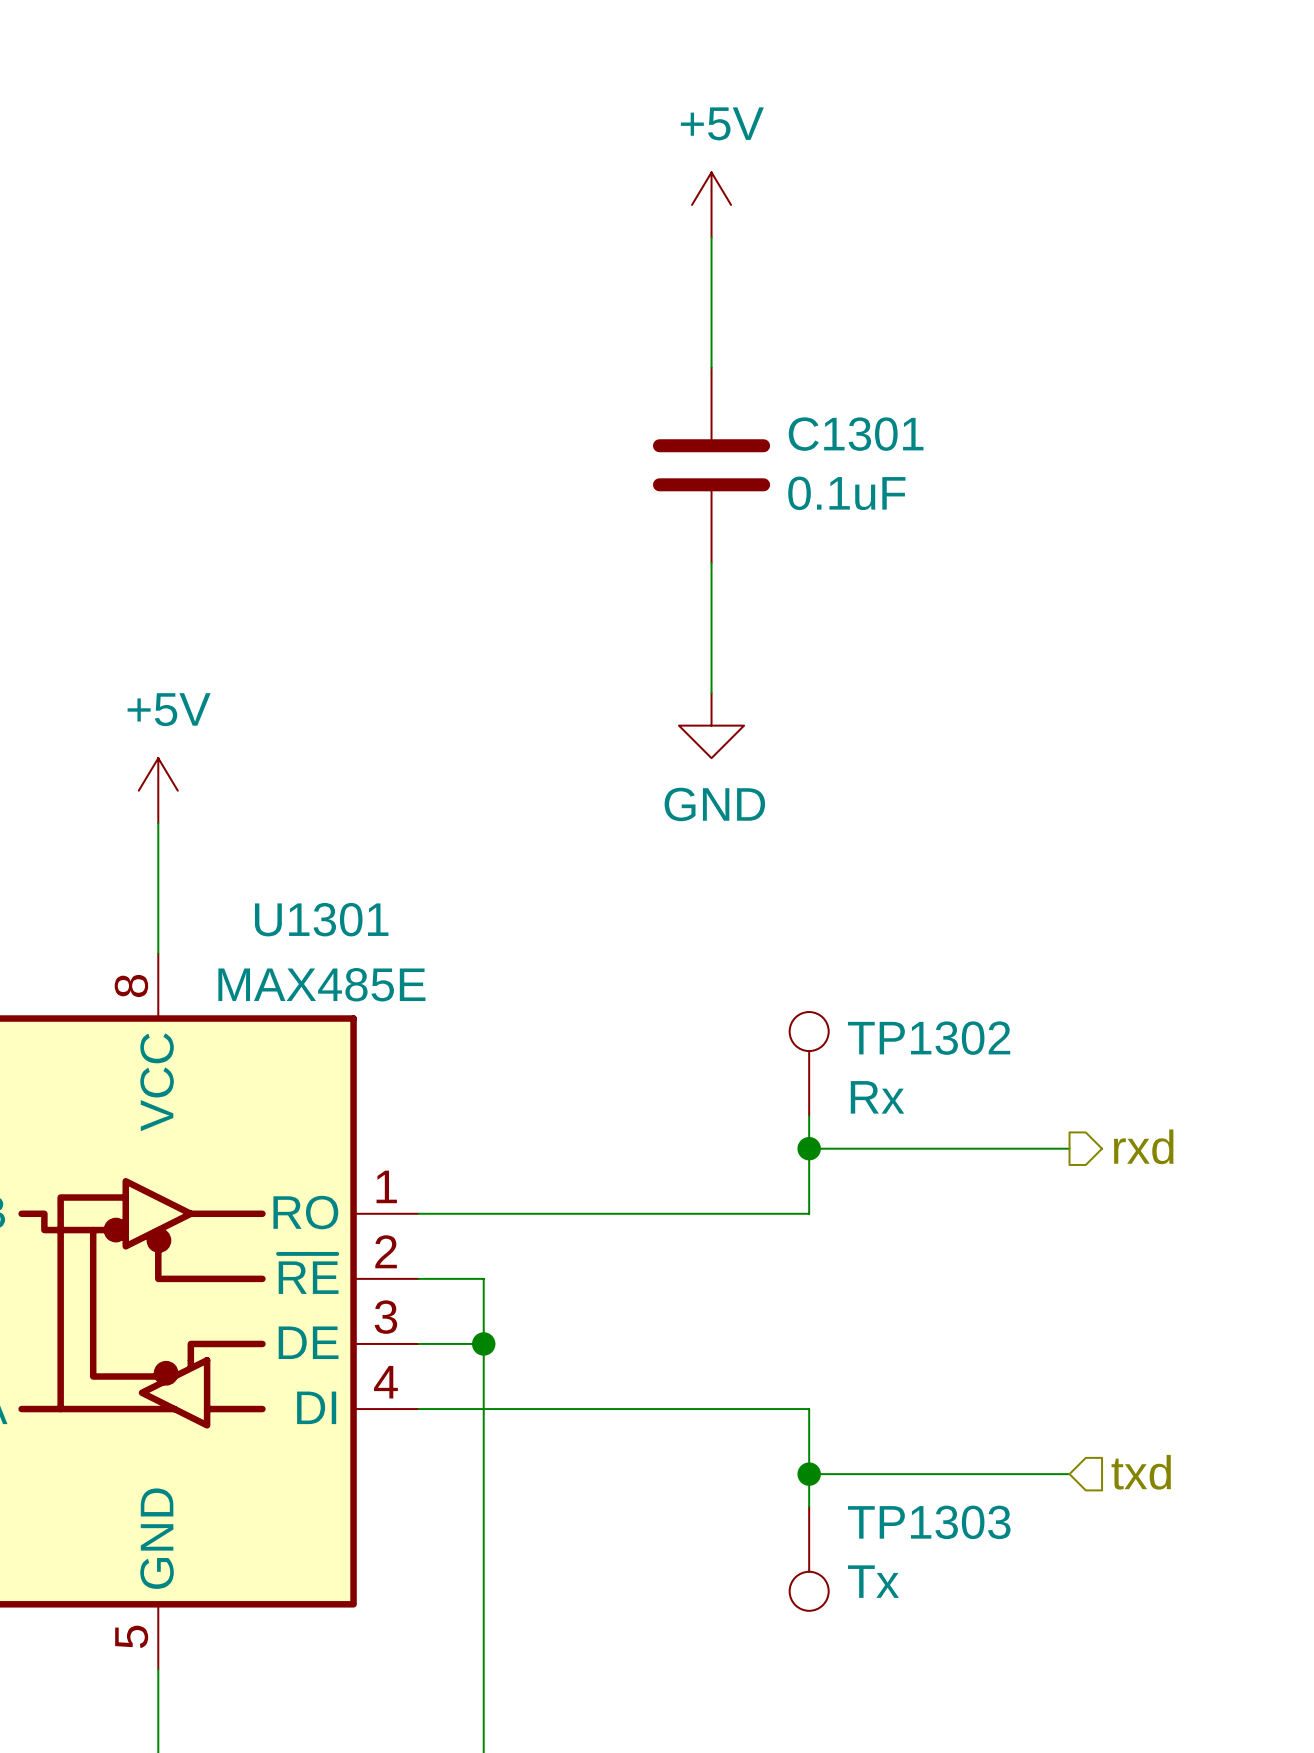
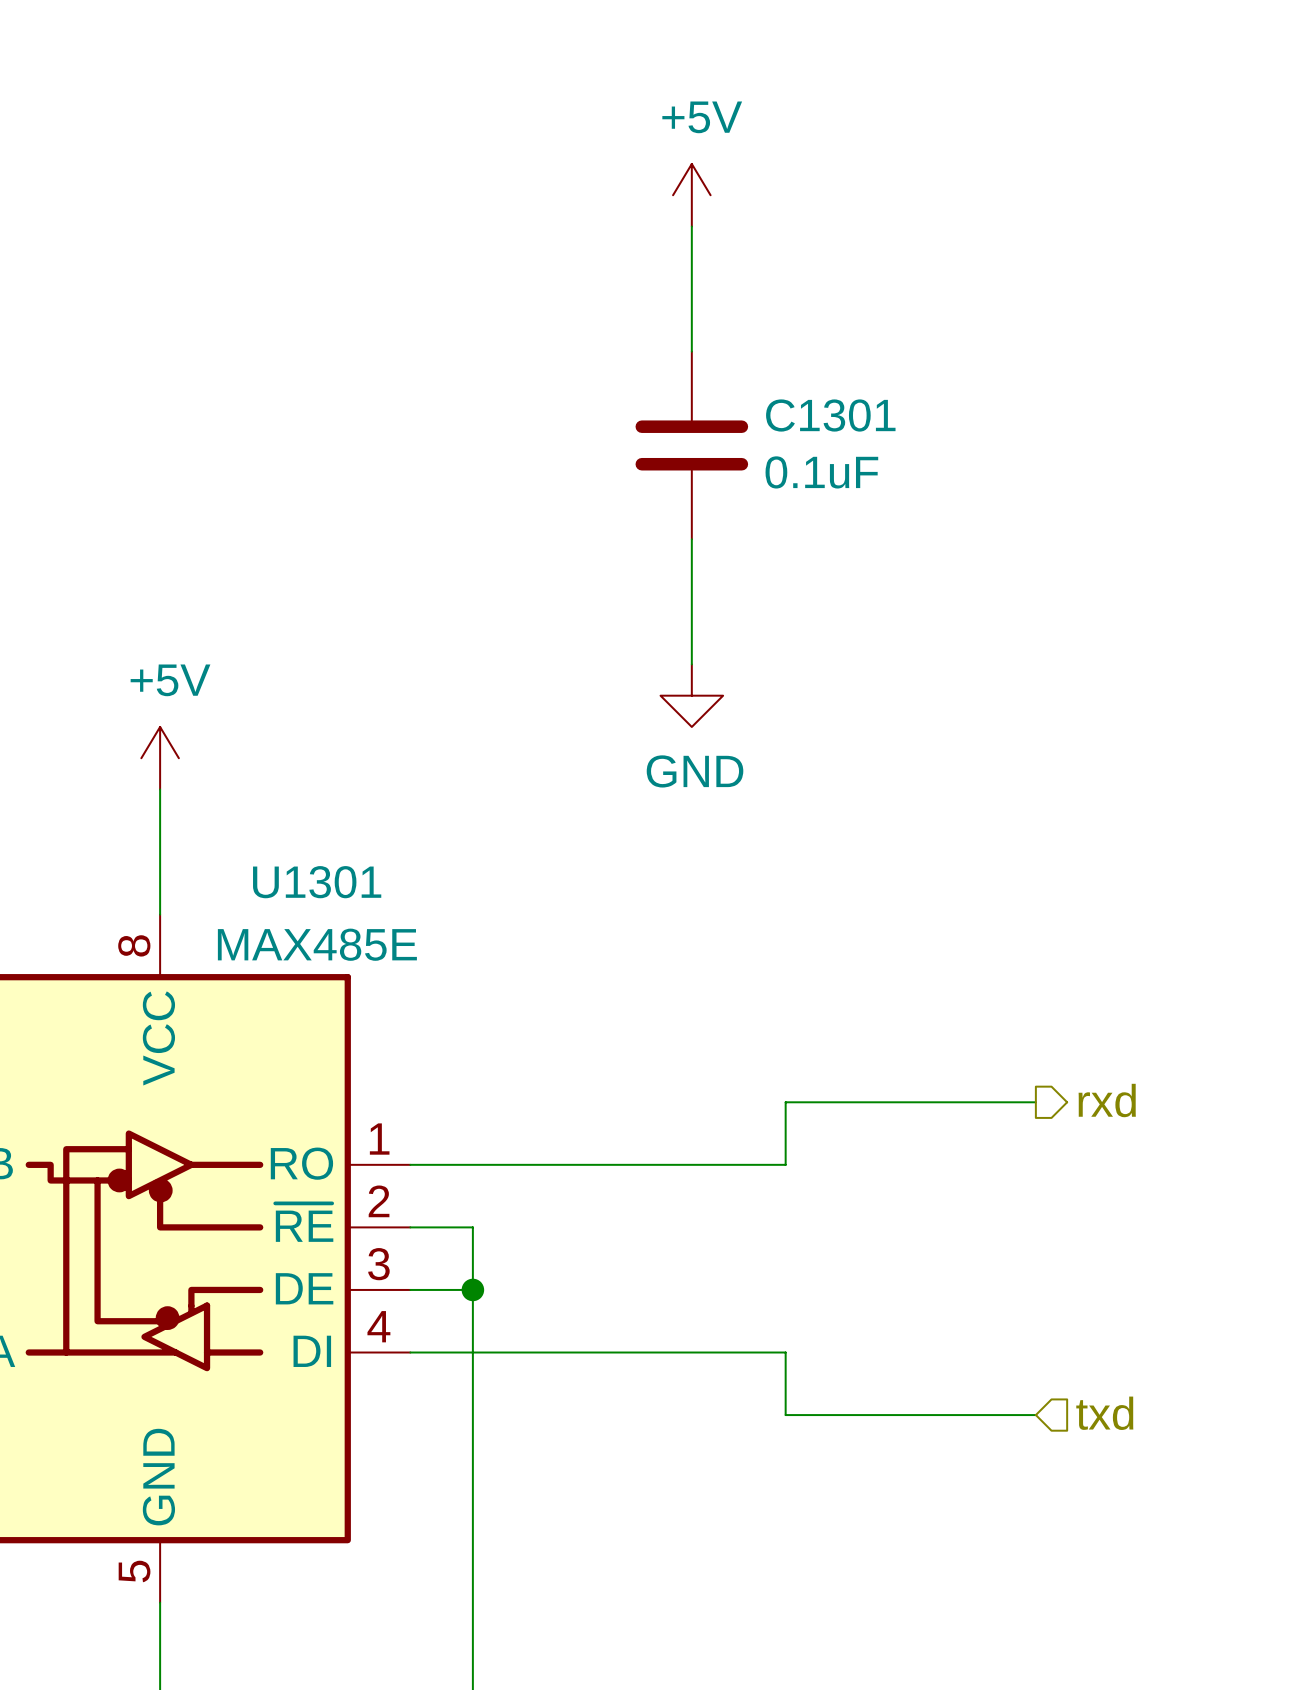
TP1302: Rx (809, 1064) -> none
wire: (809, 1116) (809, 1148) -> none
junction: (809, 1148) -> none
wire: (809, 1474) (809, 1506) -> none
junction: (809, 1474) -> none
TP1303: Tx (809, 1558) -> none

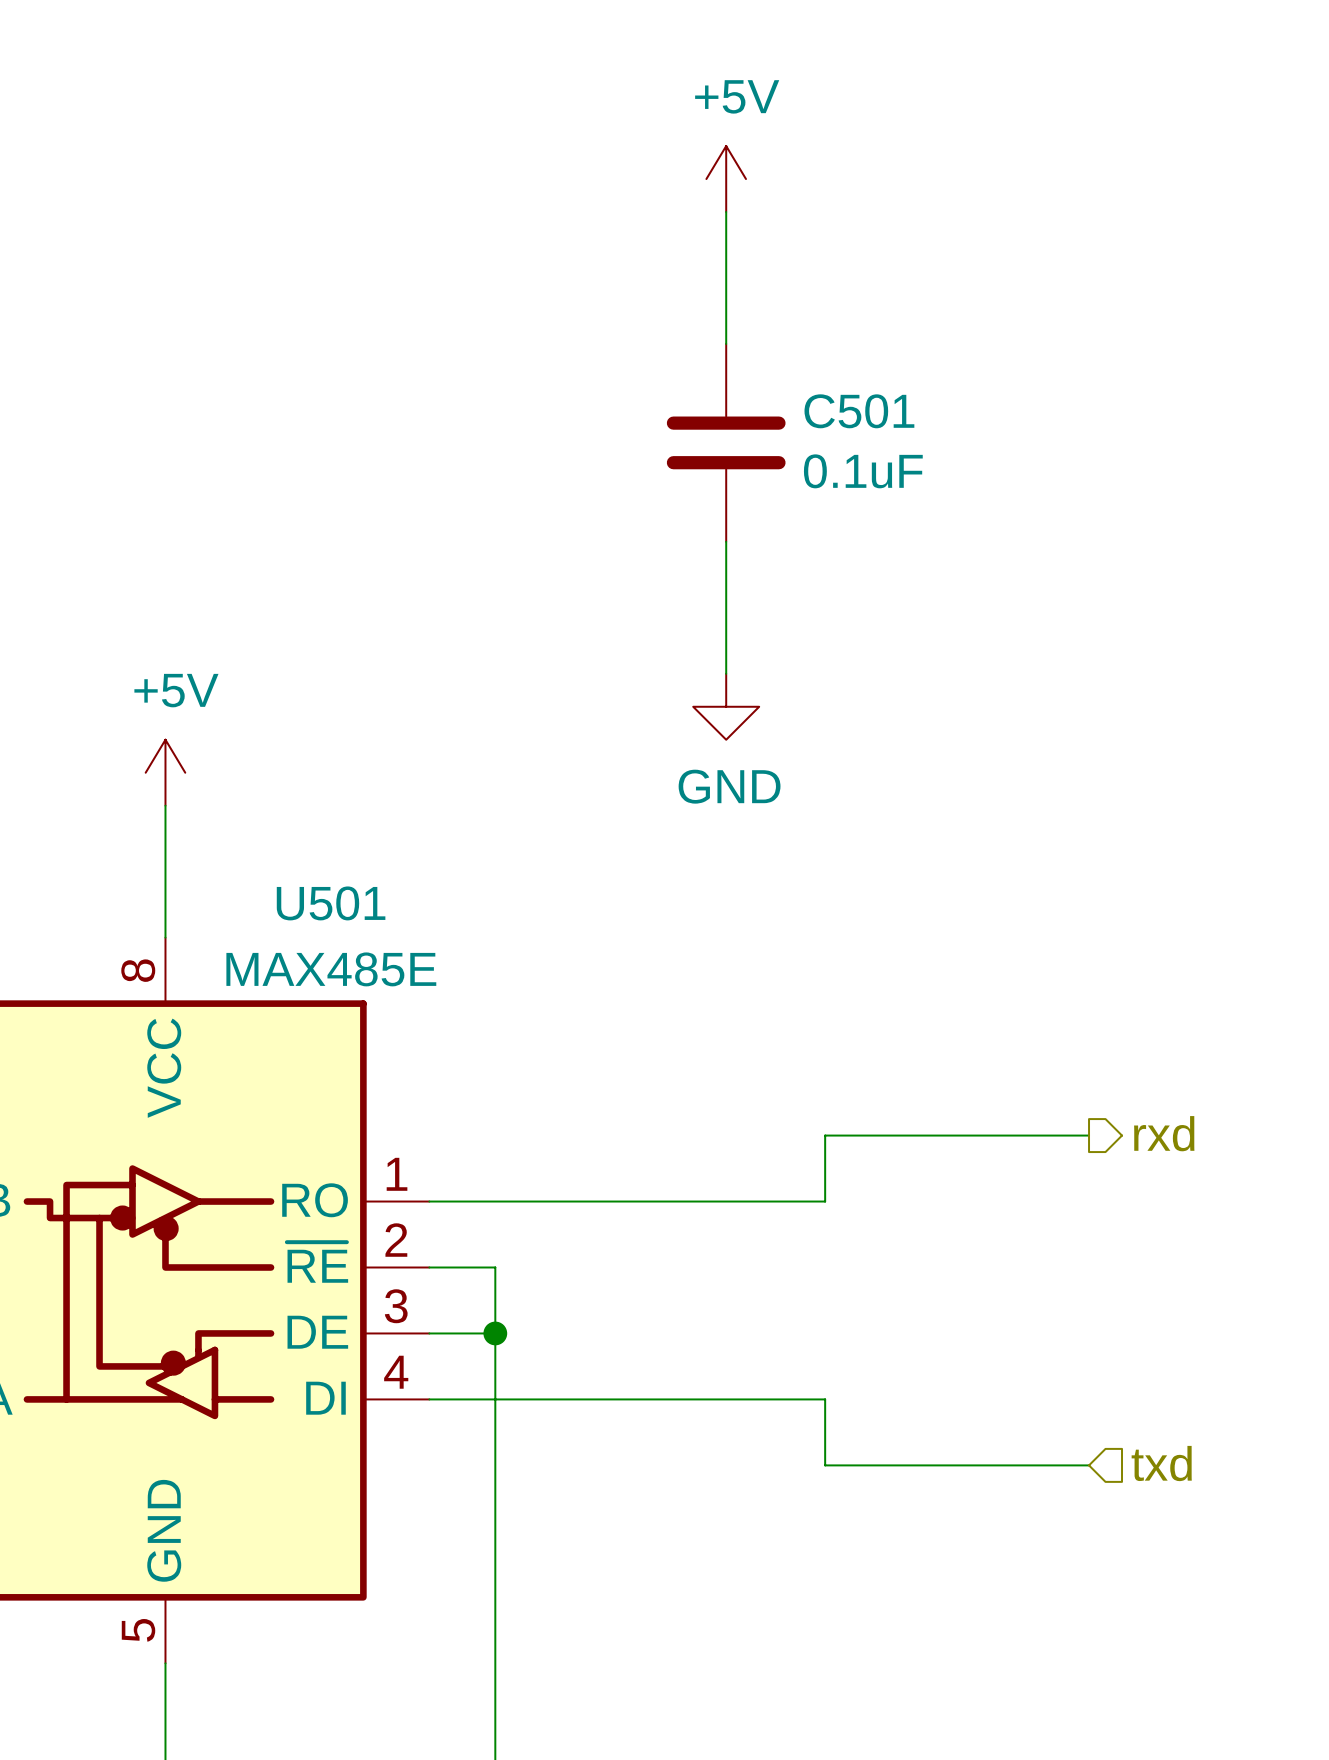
C1301 name: C1301 (830, 415) -> C501 (859, 411)
U1301 name: U1301 (317, 882) -> U501 (331, 903)

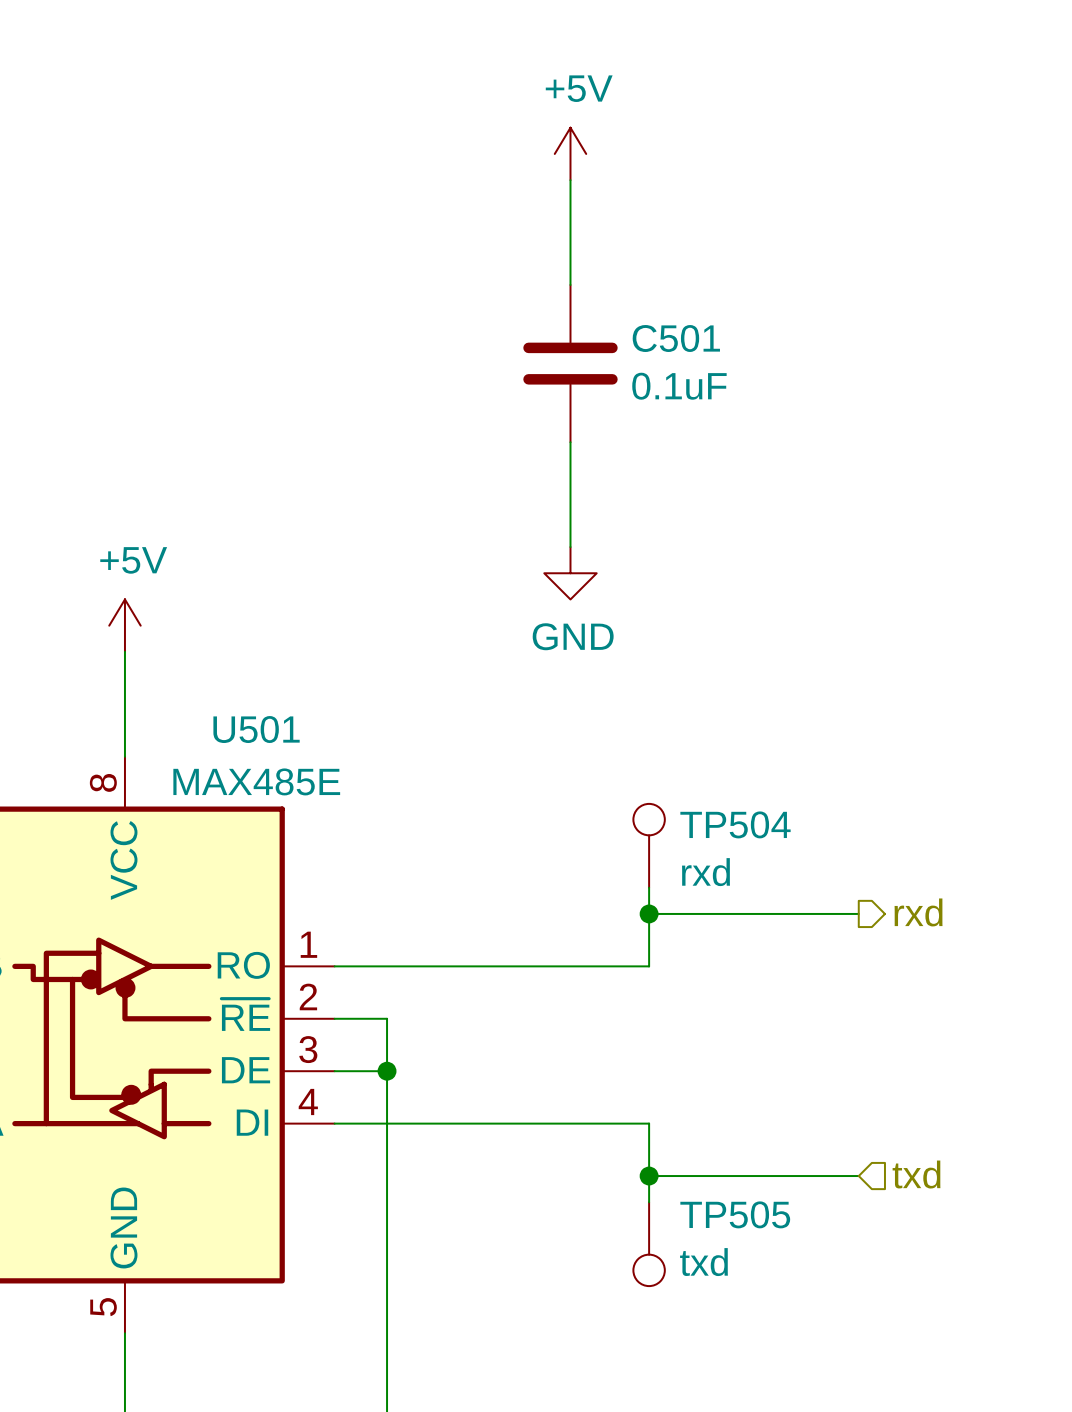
TP504: none -> rxd (649, 845)
wire: none -> (649, 887) (649, 913)
junction: none -> (649, 913)
wire: none -> (649, 1176) (649, 1202)
junction: none -> (649, 1176)
TP505: none -> txd (649, 1244)

